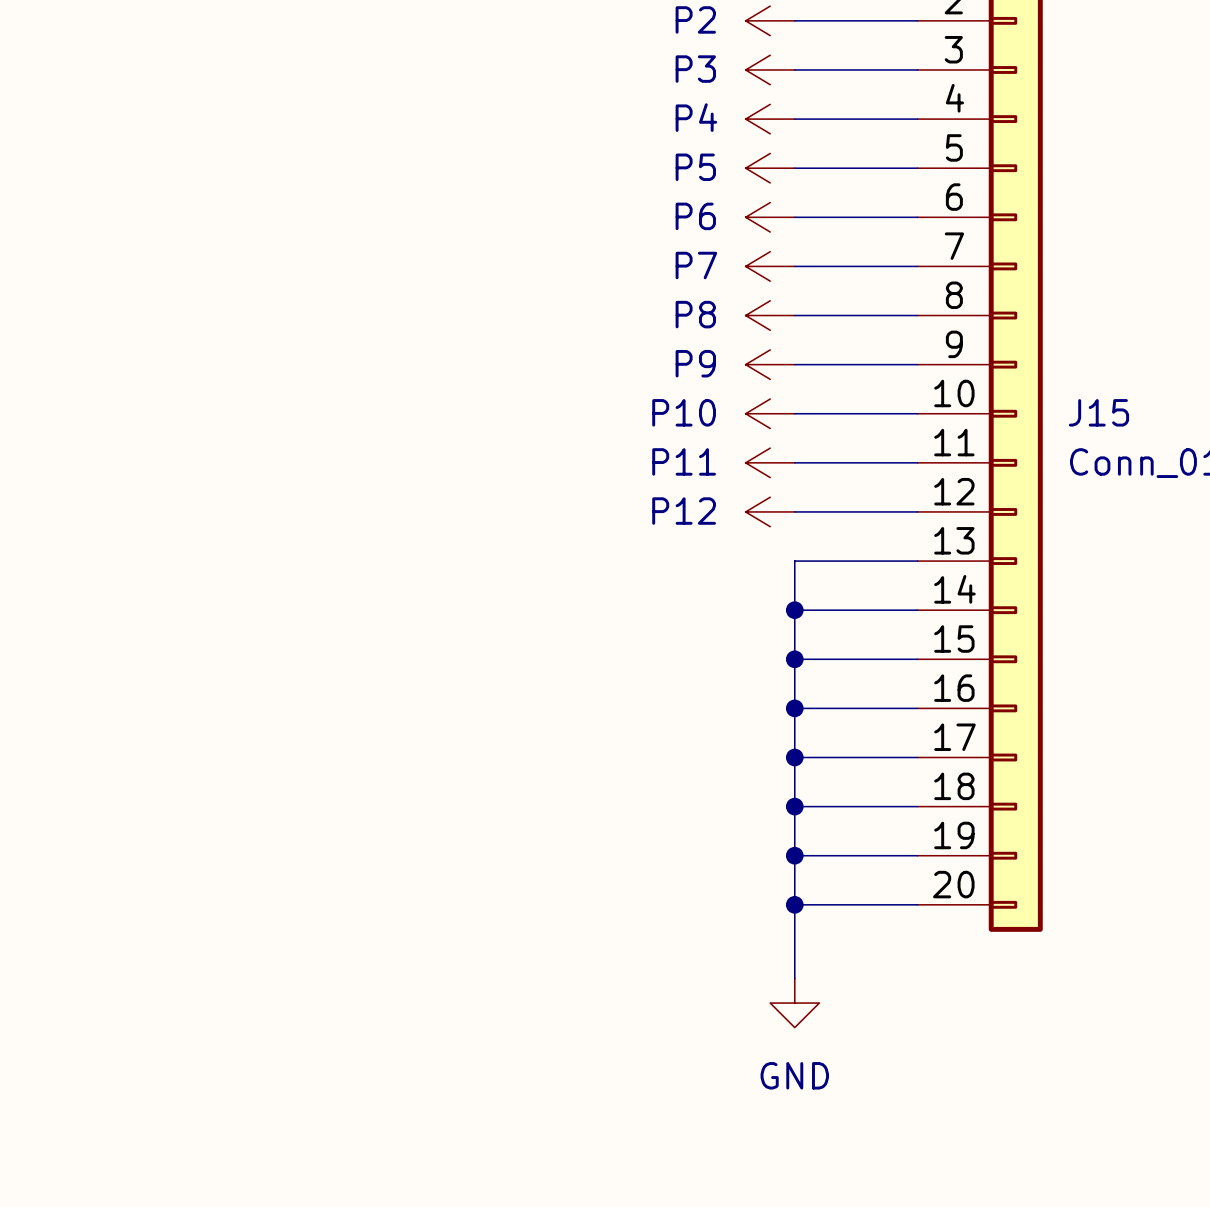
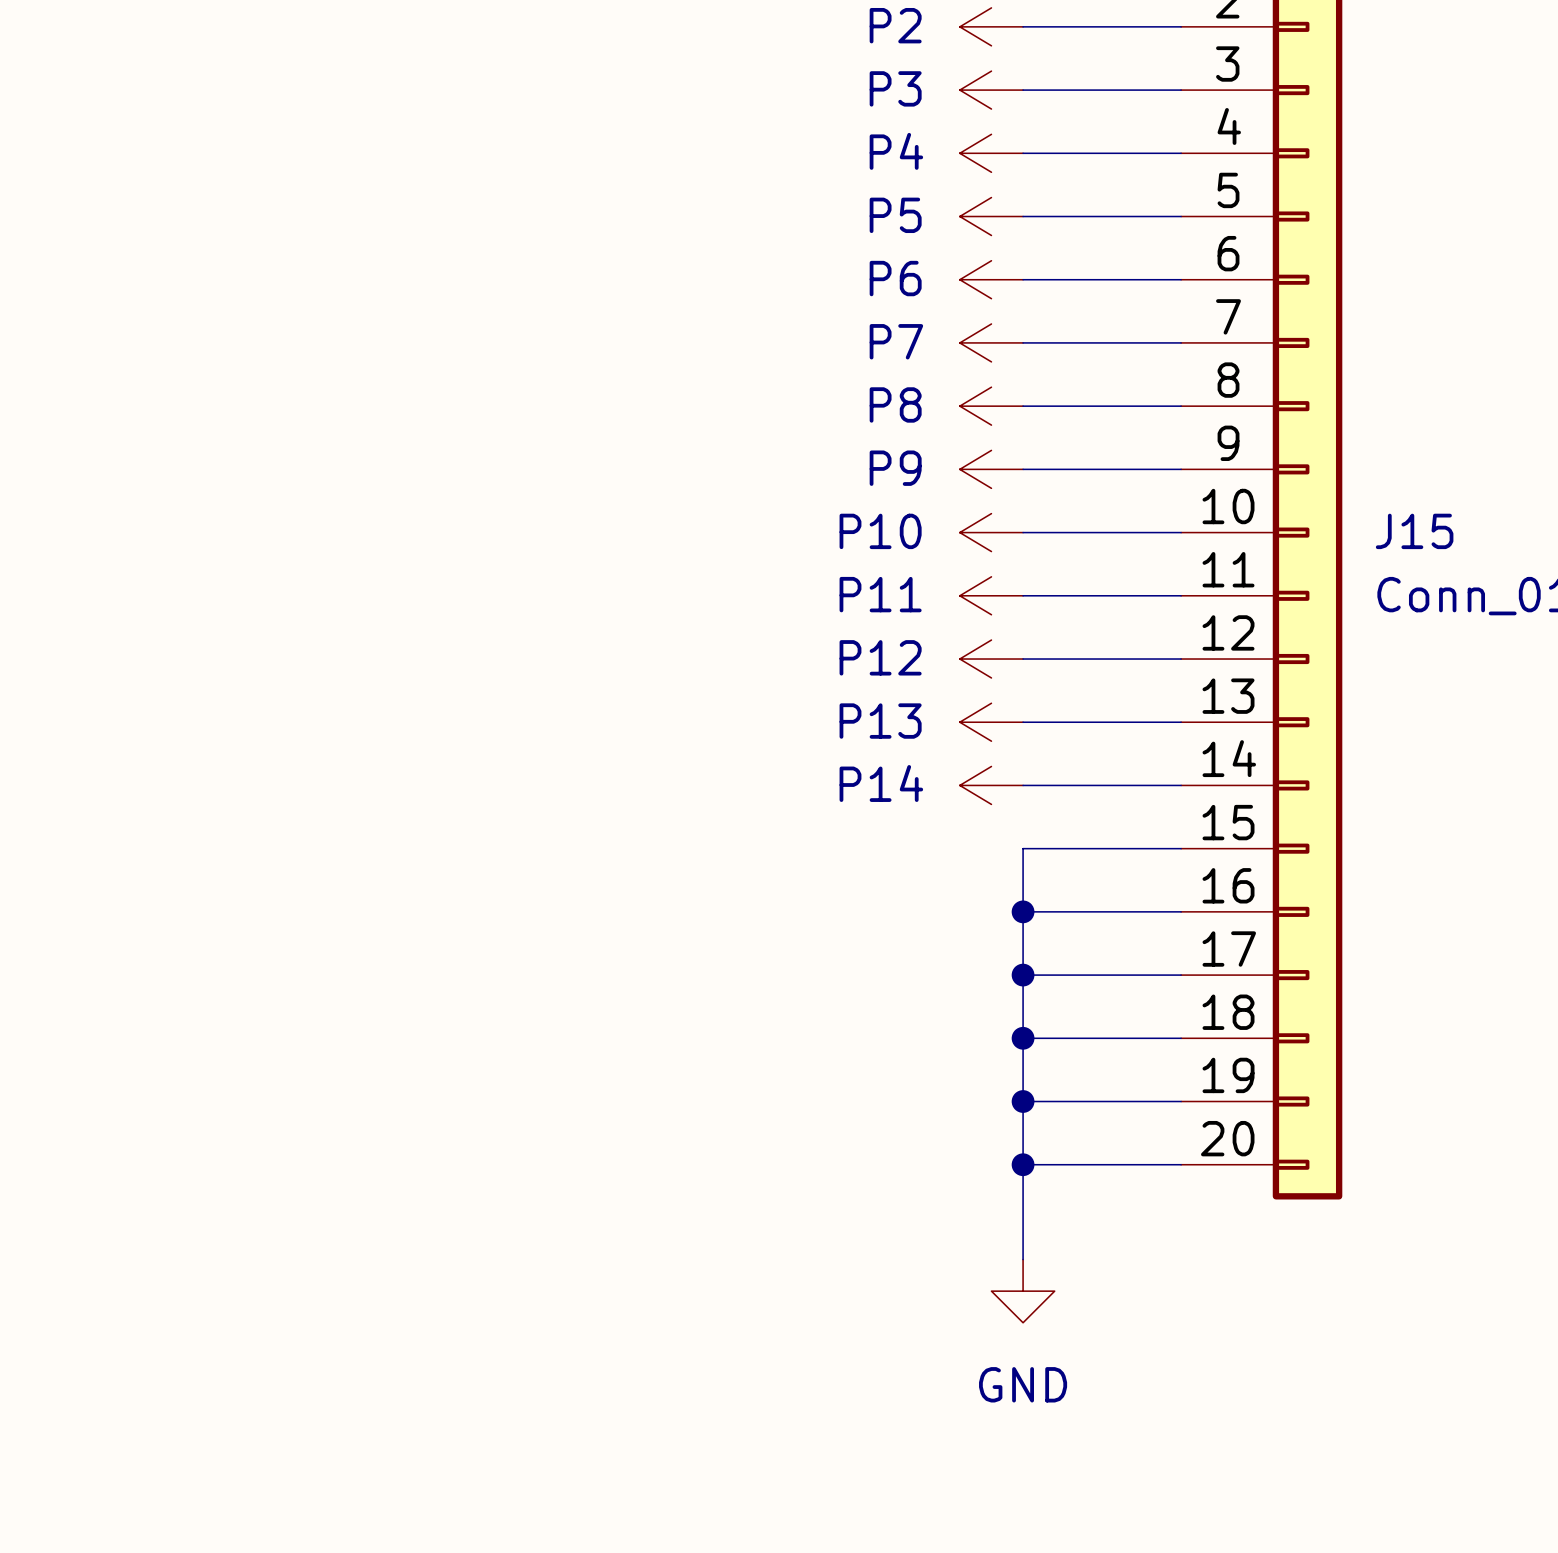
power symbol: none -> P13 (991, 722)
wire: (794, 561) (794, 659) -> none
power symbol: none -> P14 (991, 785)
junction: (794, 610) -> none
junction: (794, 659) -> none

